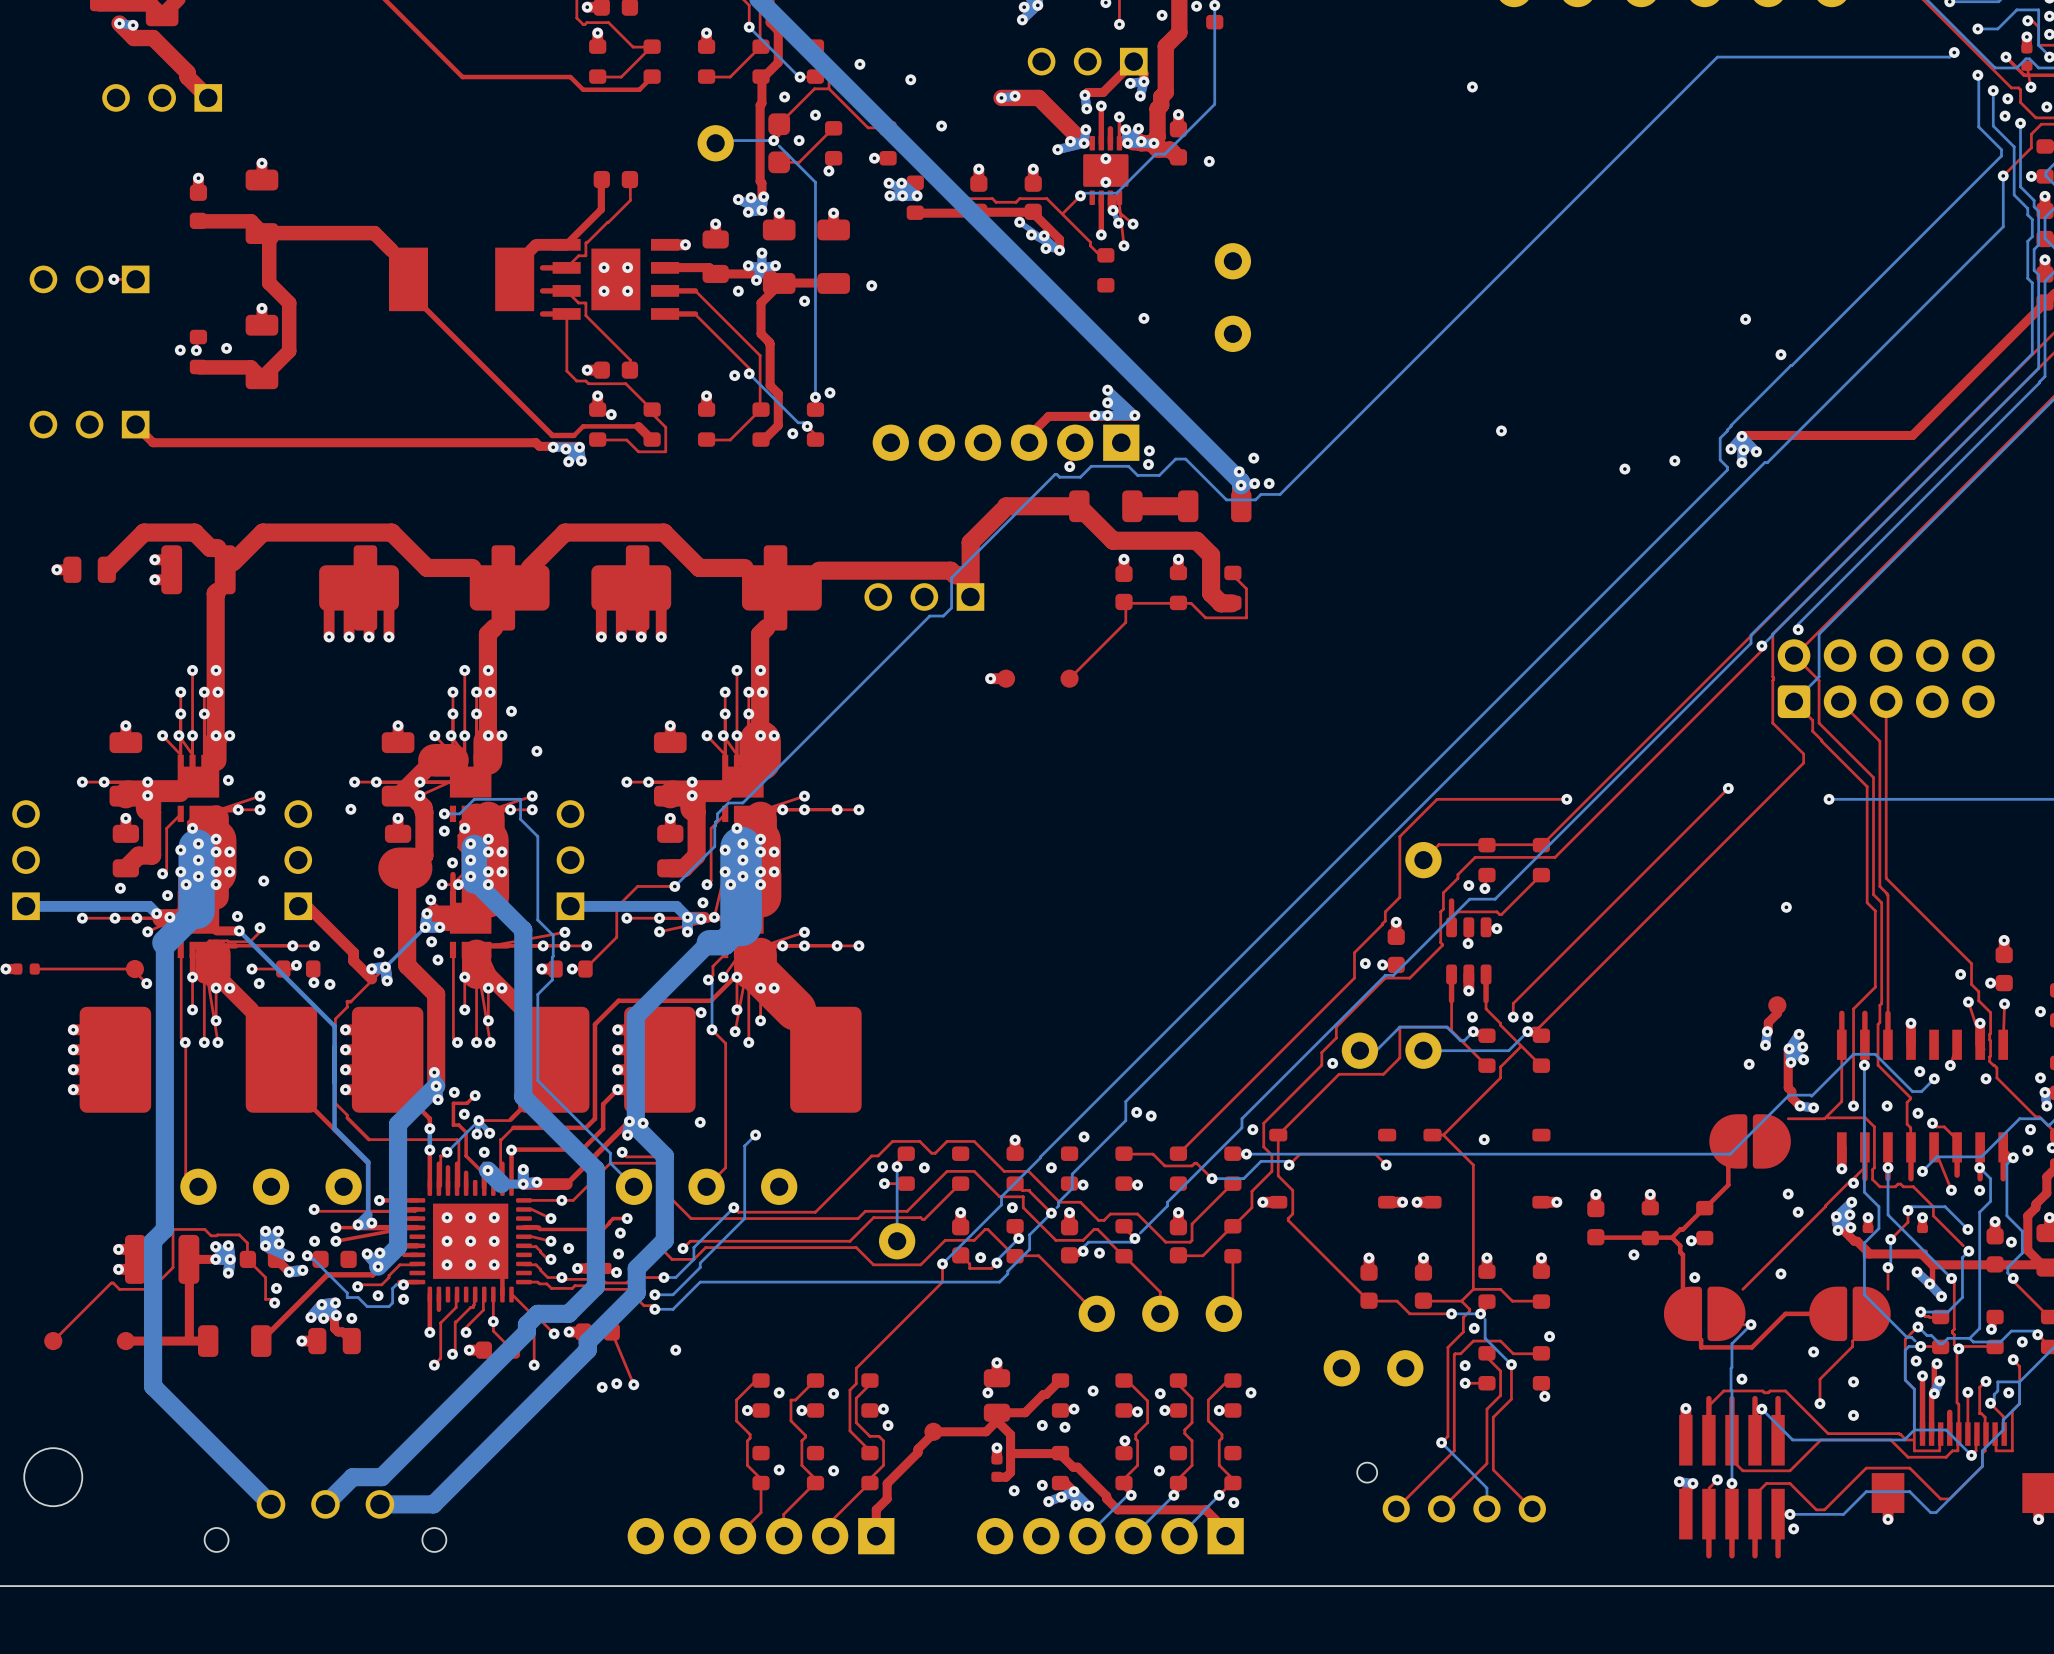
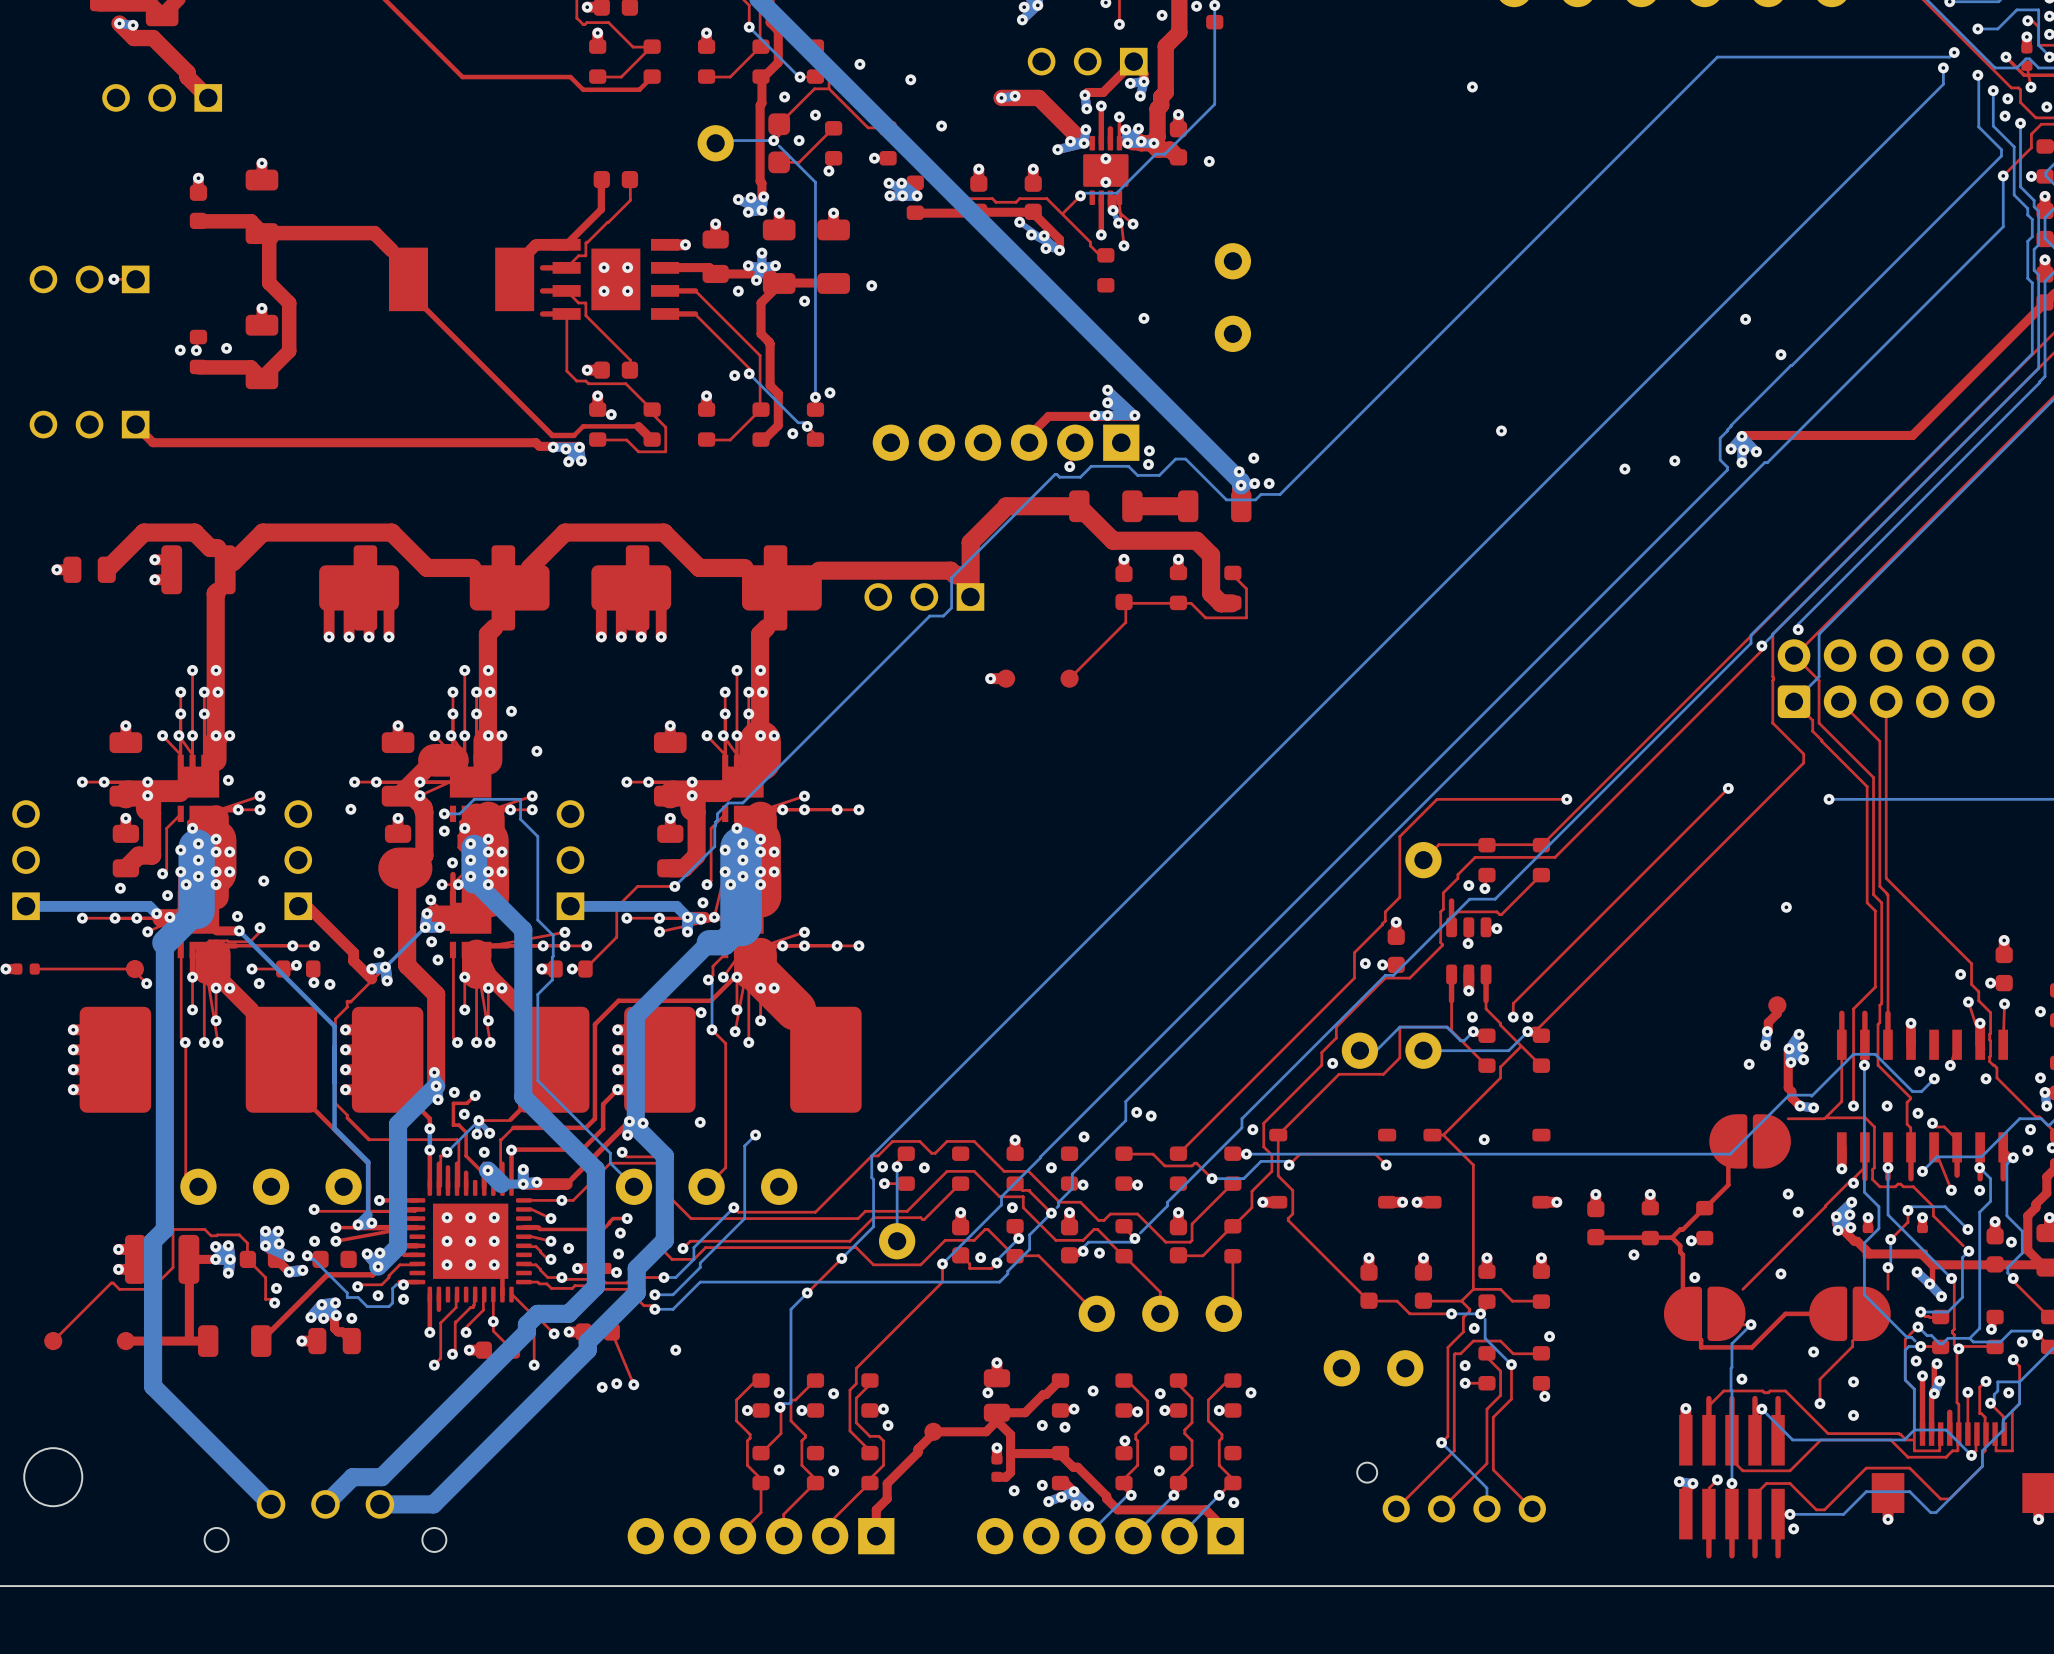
bottom track: none -> (1943, 67) (1943, 84) (871, 1155) (873, 1226) (841, 1258)
via: none -> (1943, 67)
top track: none -> (841, 1258) (807, 1292)
via: none -> (841, 1258)
bottom track: none -> (807, 1292) (790, 1309) (790, 1402) (783, 1403) (780, 1407)
via: none -> (807, 1292)
top track: none -> (780, 1407) (781, 1433) (761, 1452)
via: none -> (780, 1407)

